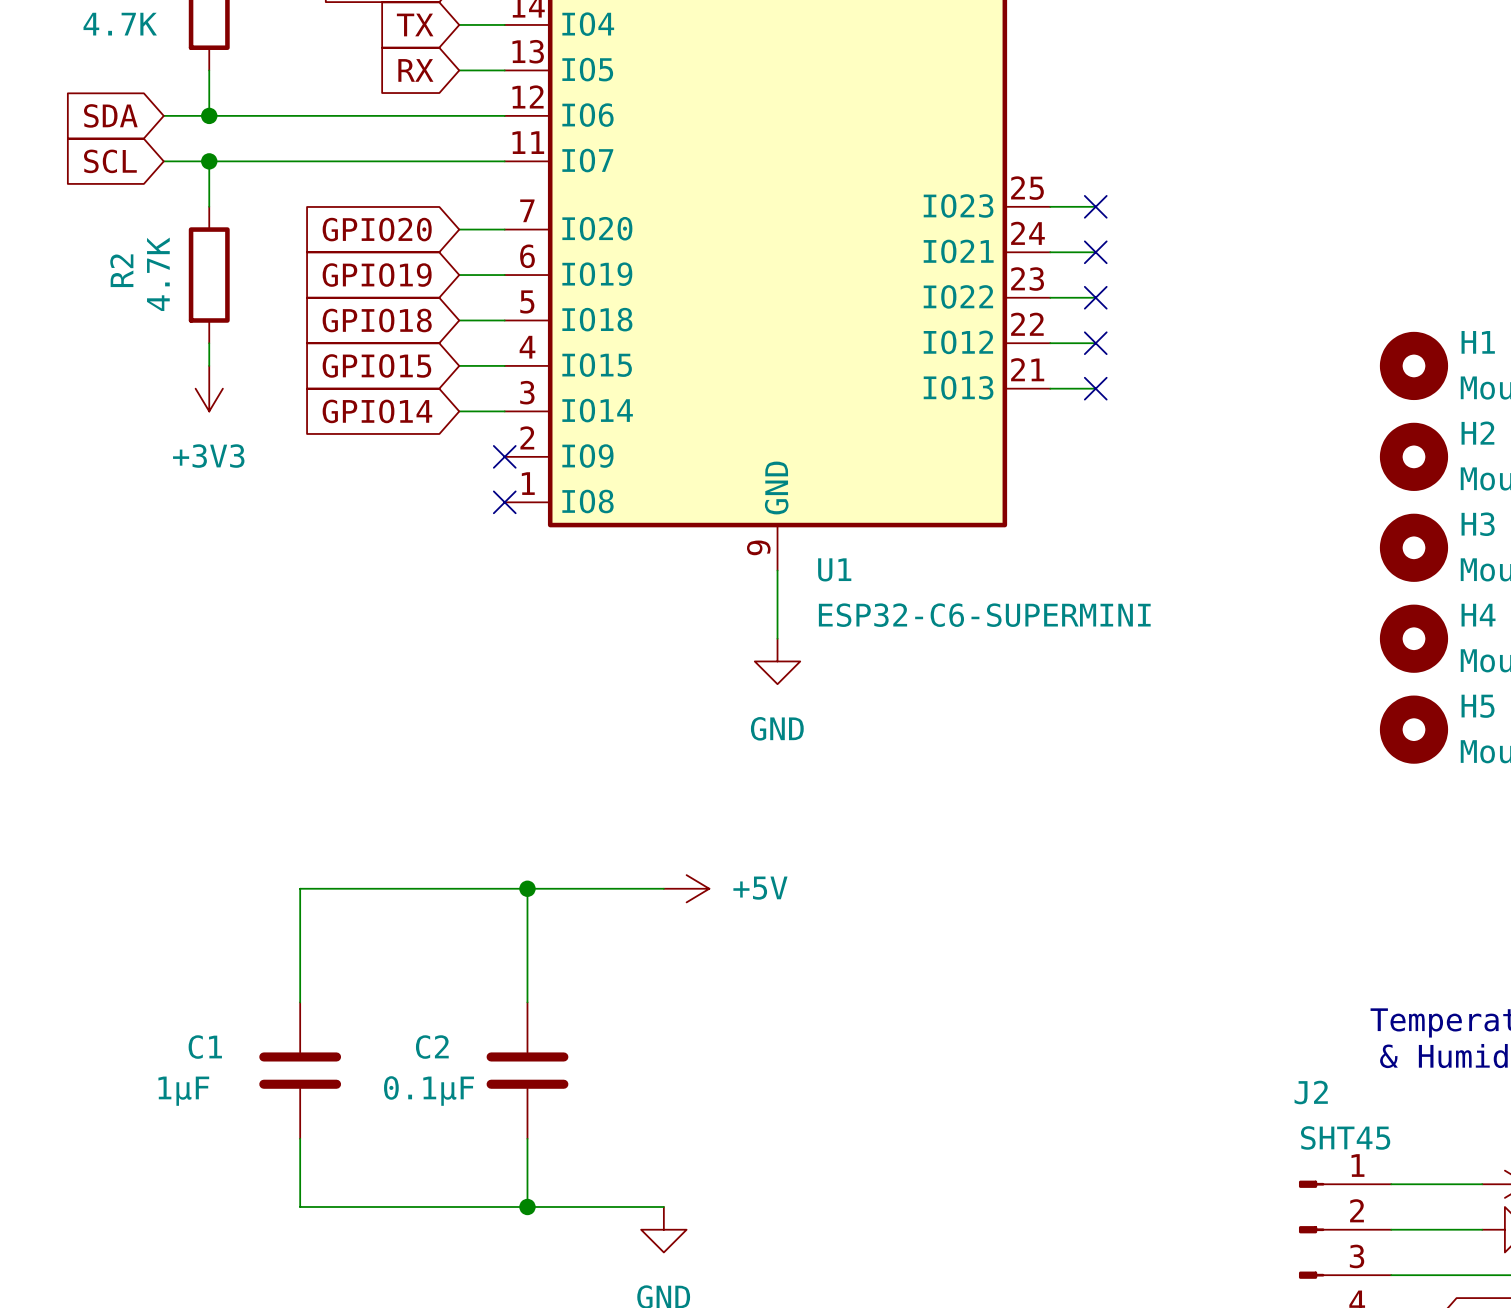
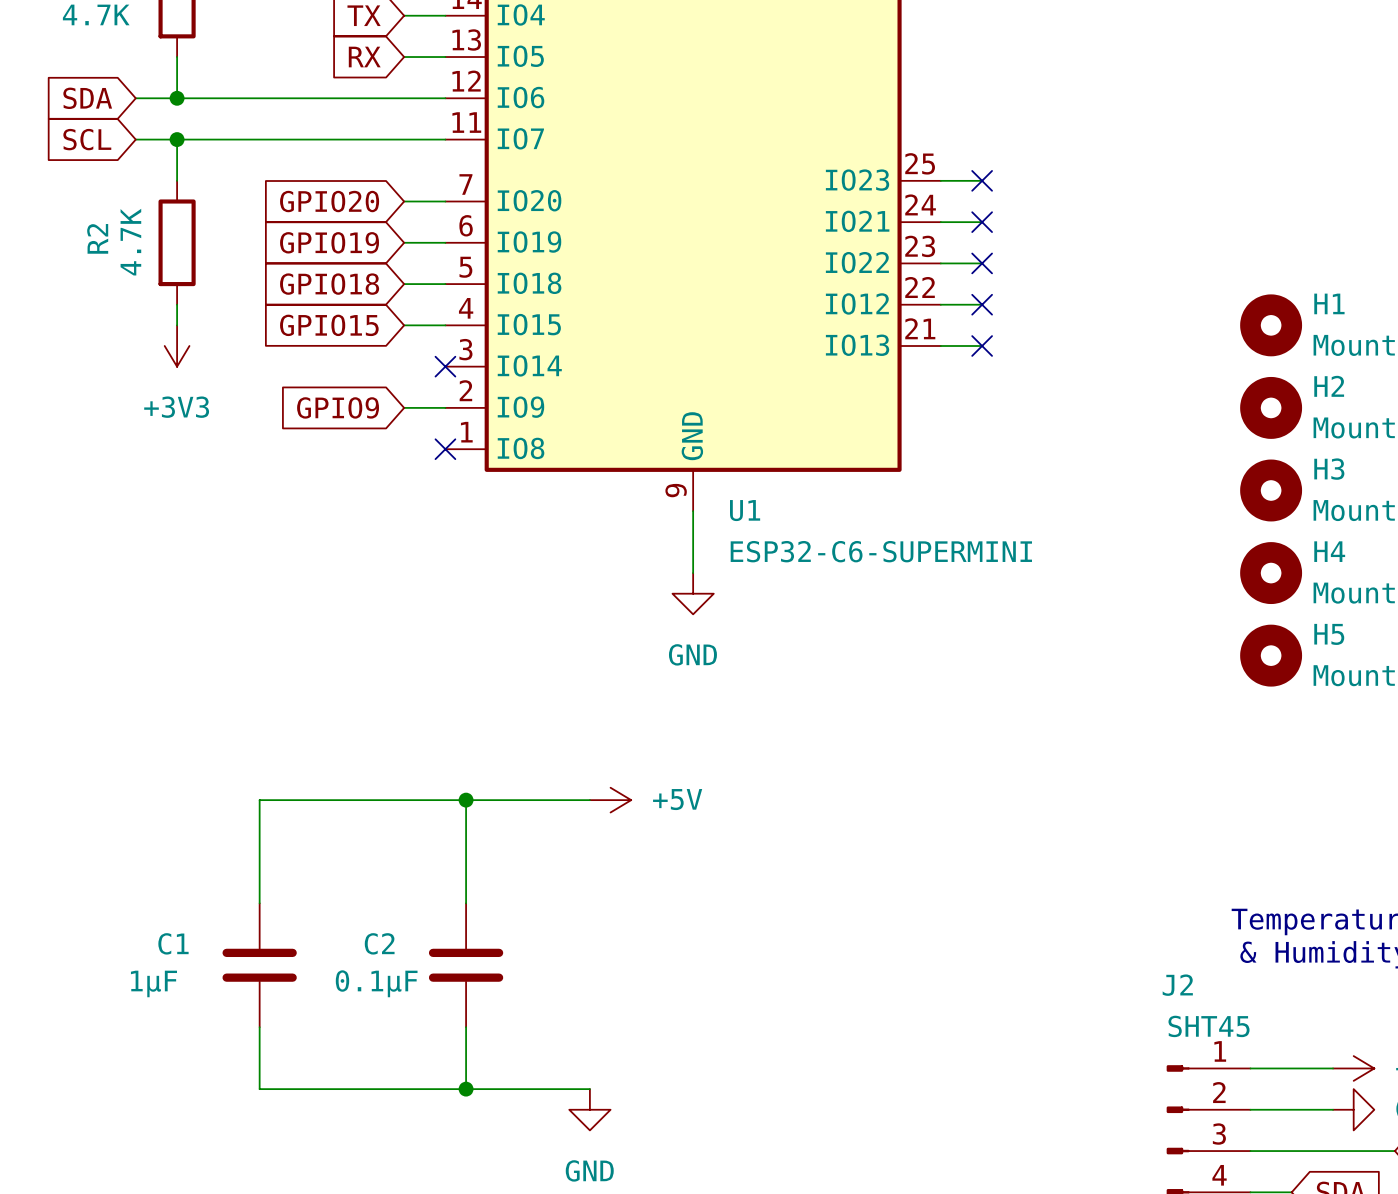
global label: GPIO14 (377, 411) -> GPIO9 (338, 407)
wire: (459, 411) (504, 411) -> (404, 407) (445, 407)
no-connect mark position: (504, 456) -> (445, 366)

